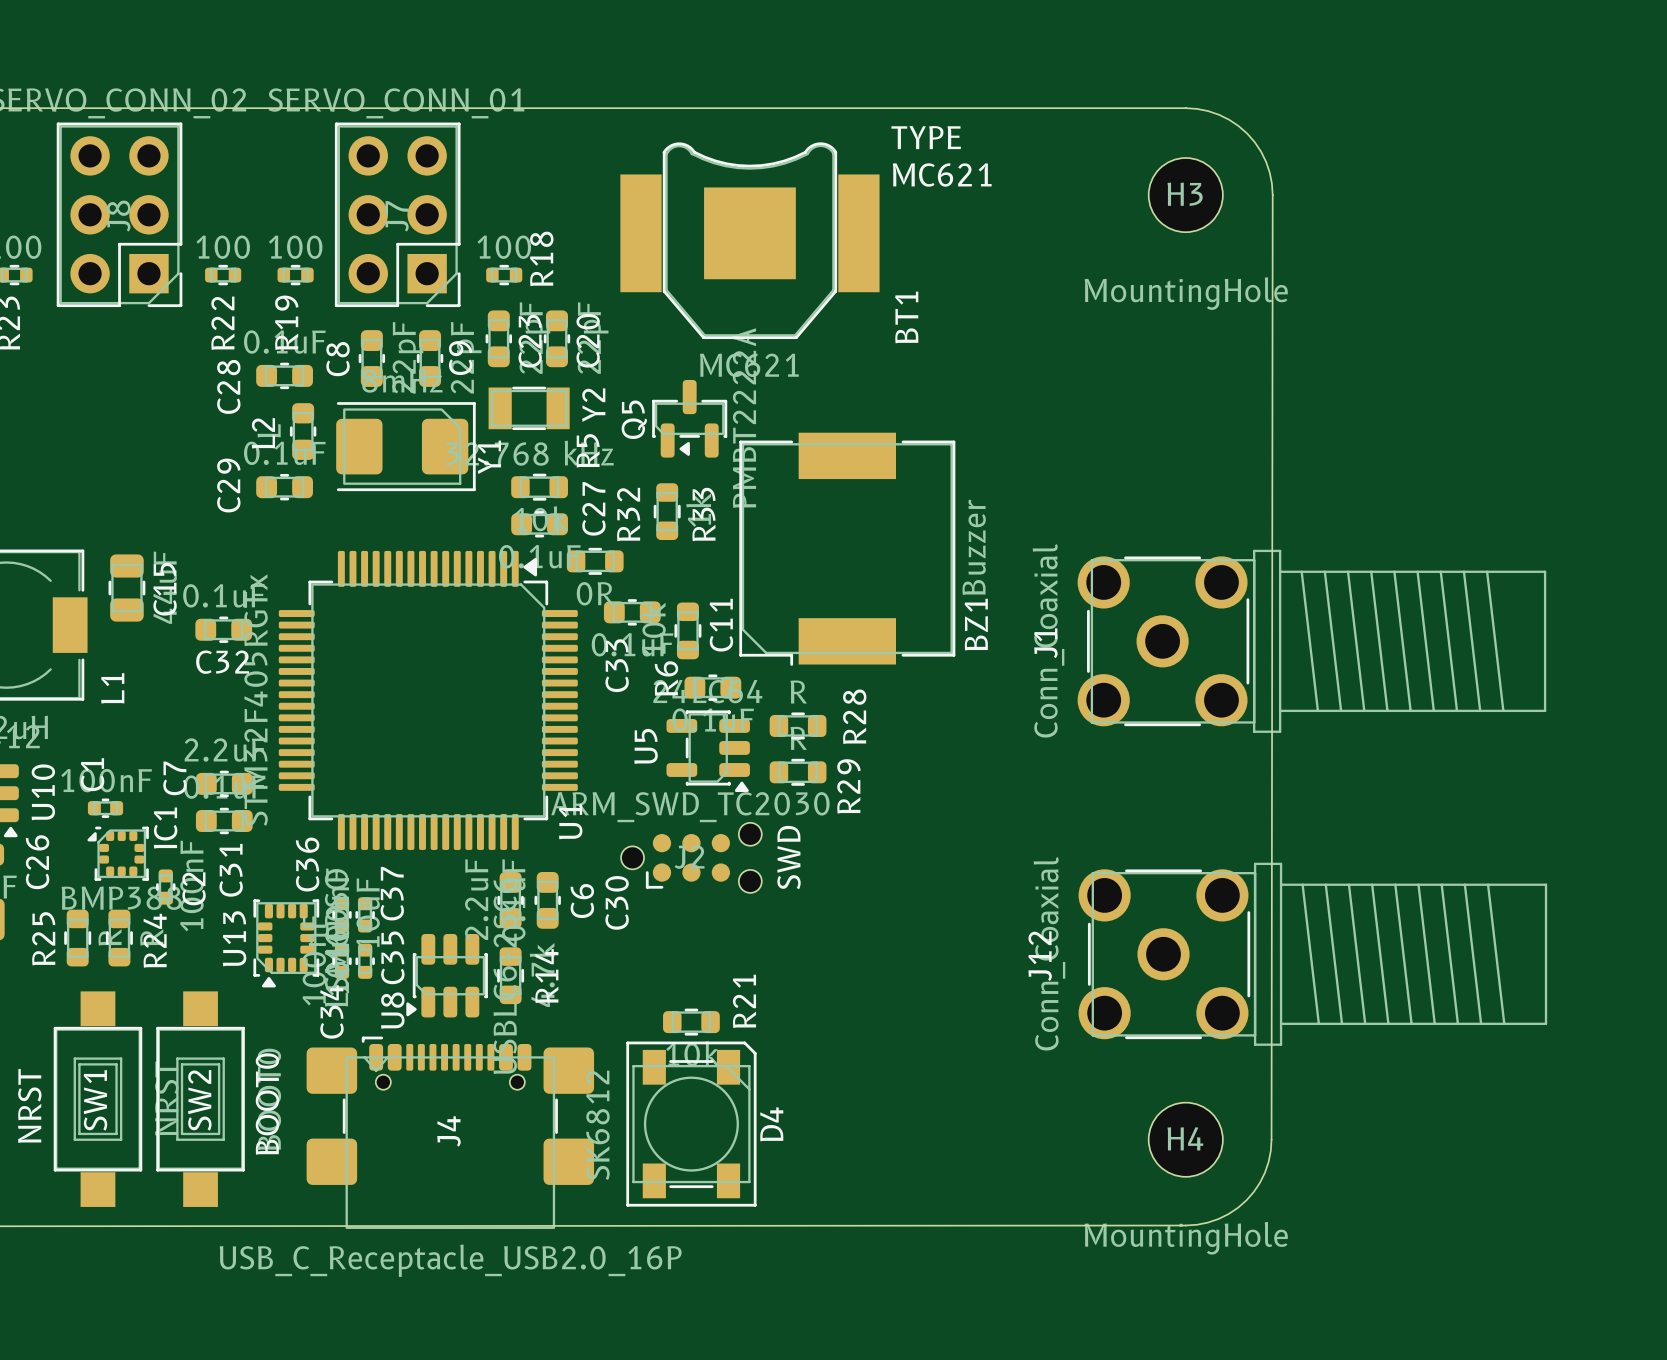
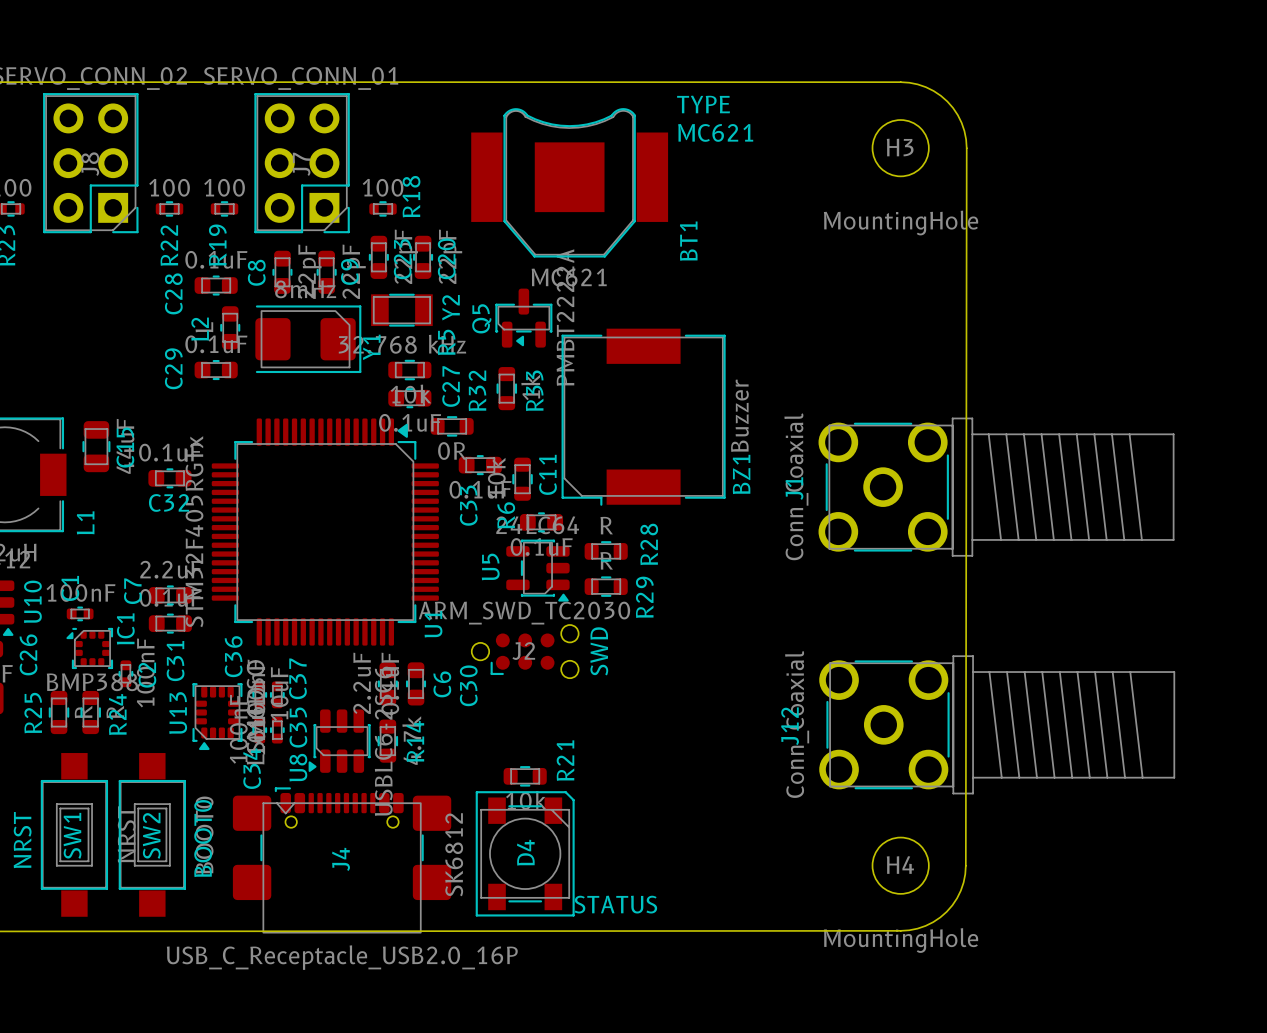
D4 name position: D4 (771, 1124) -> D4 (525, 852)
text: none -> STATUS (615, 904)

